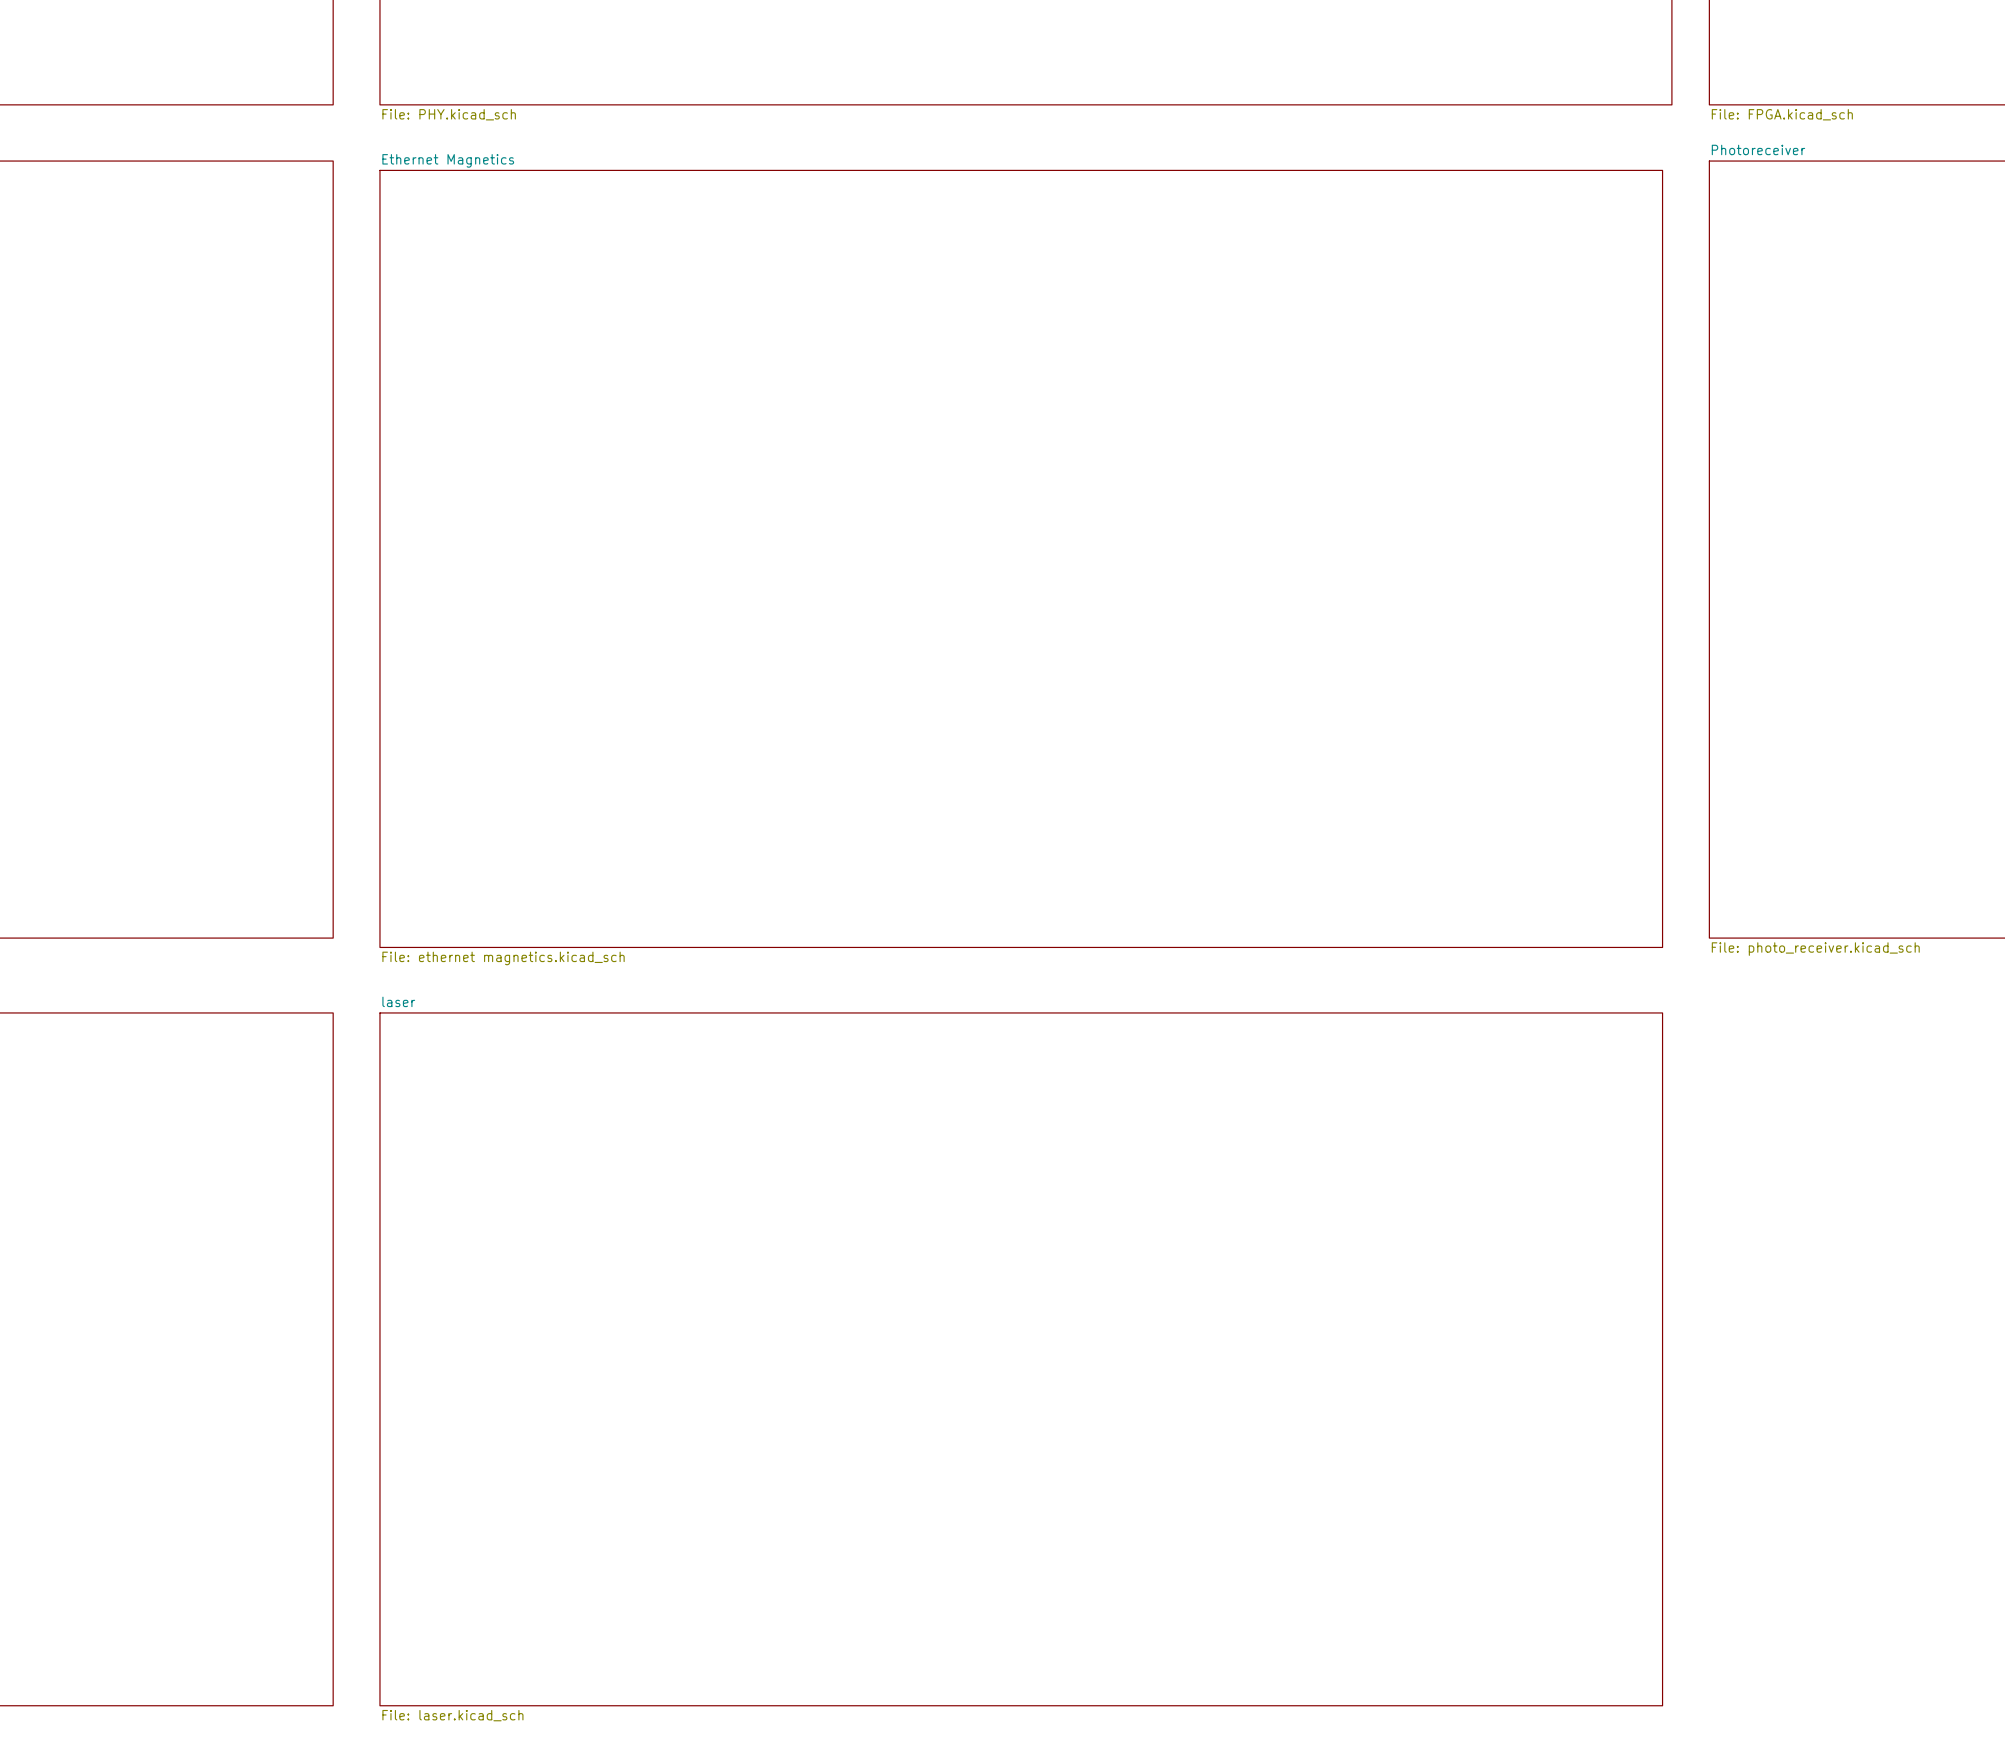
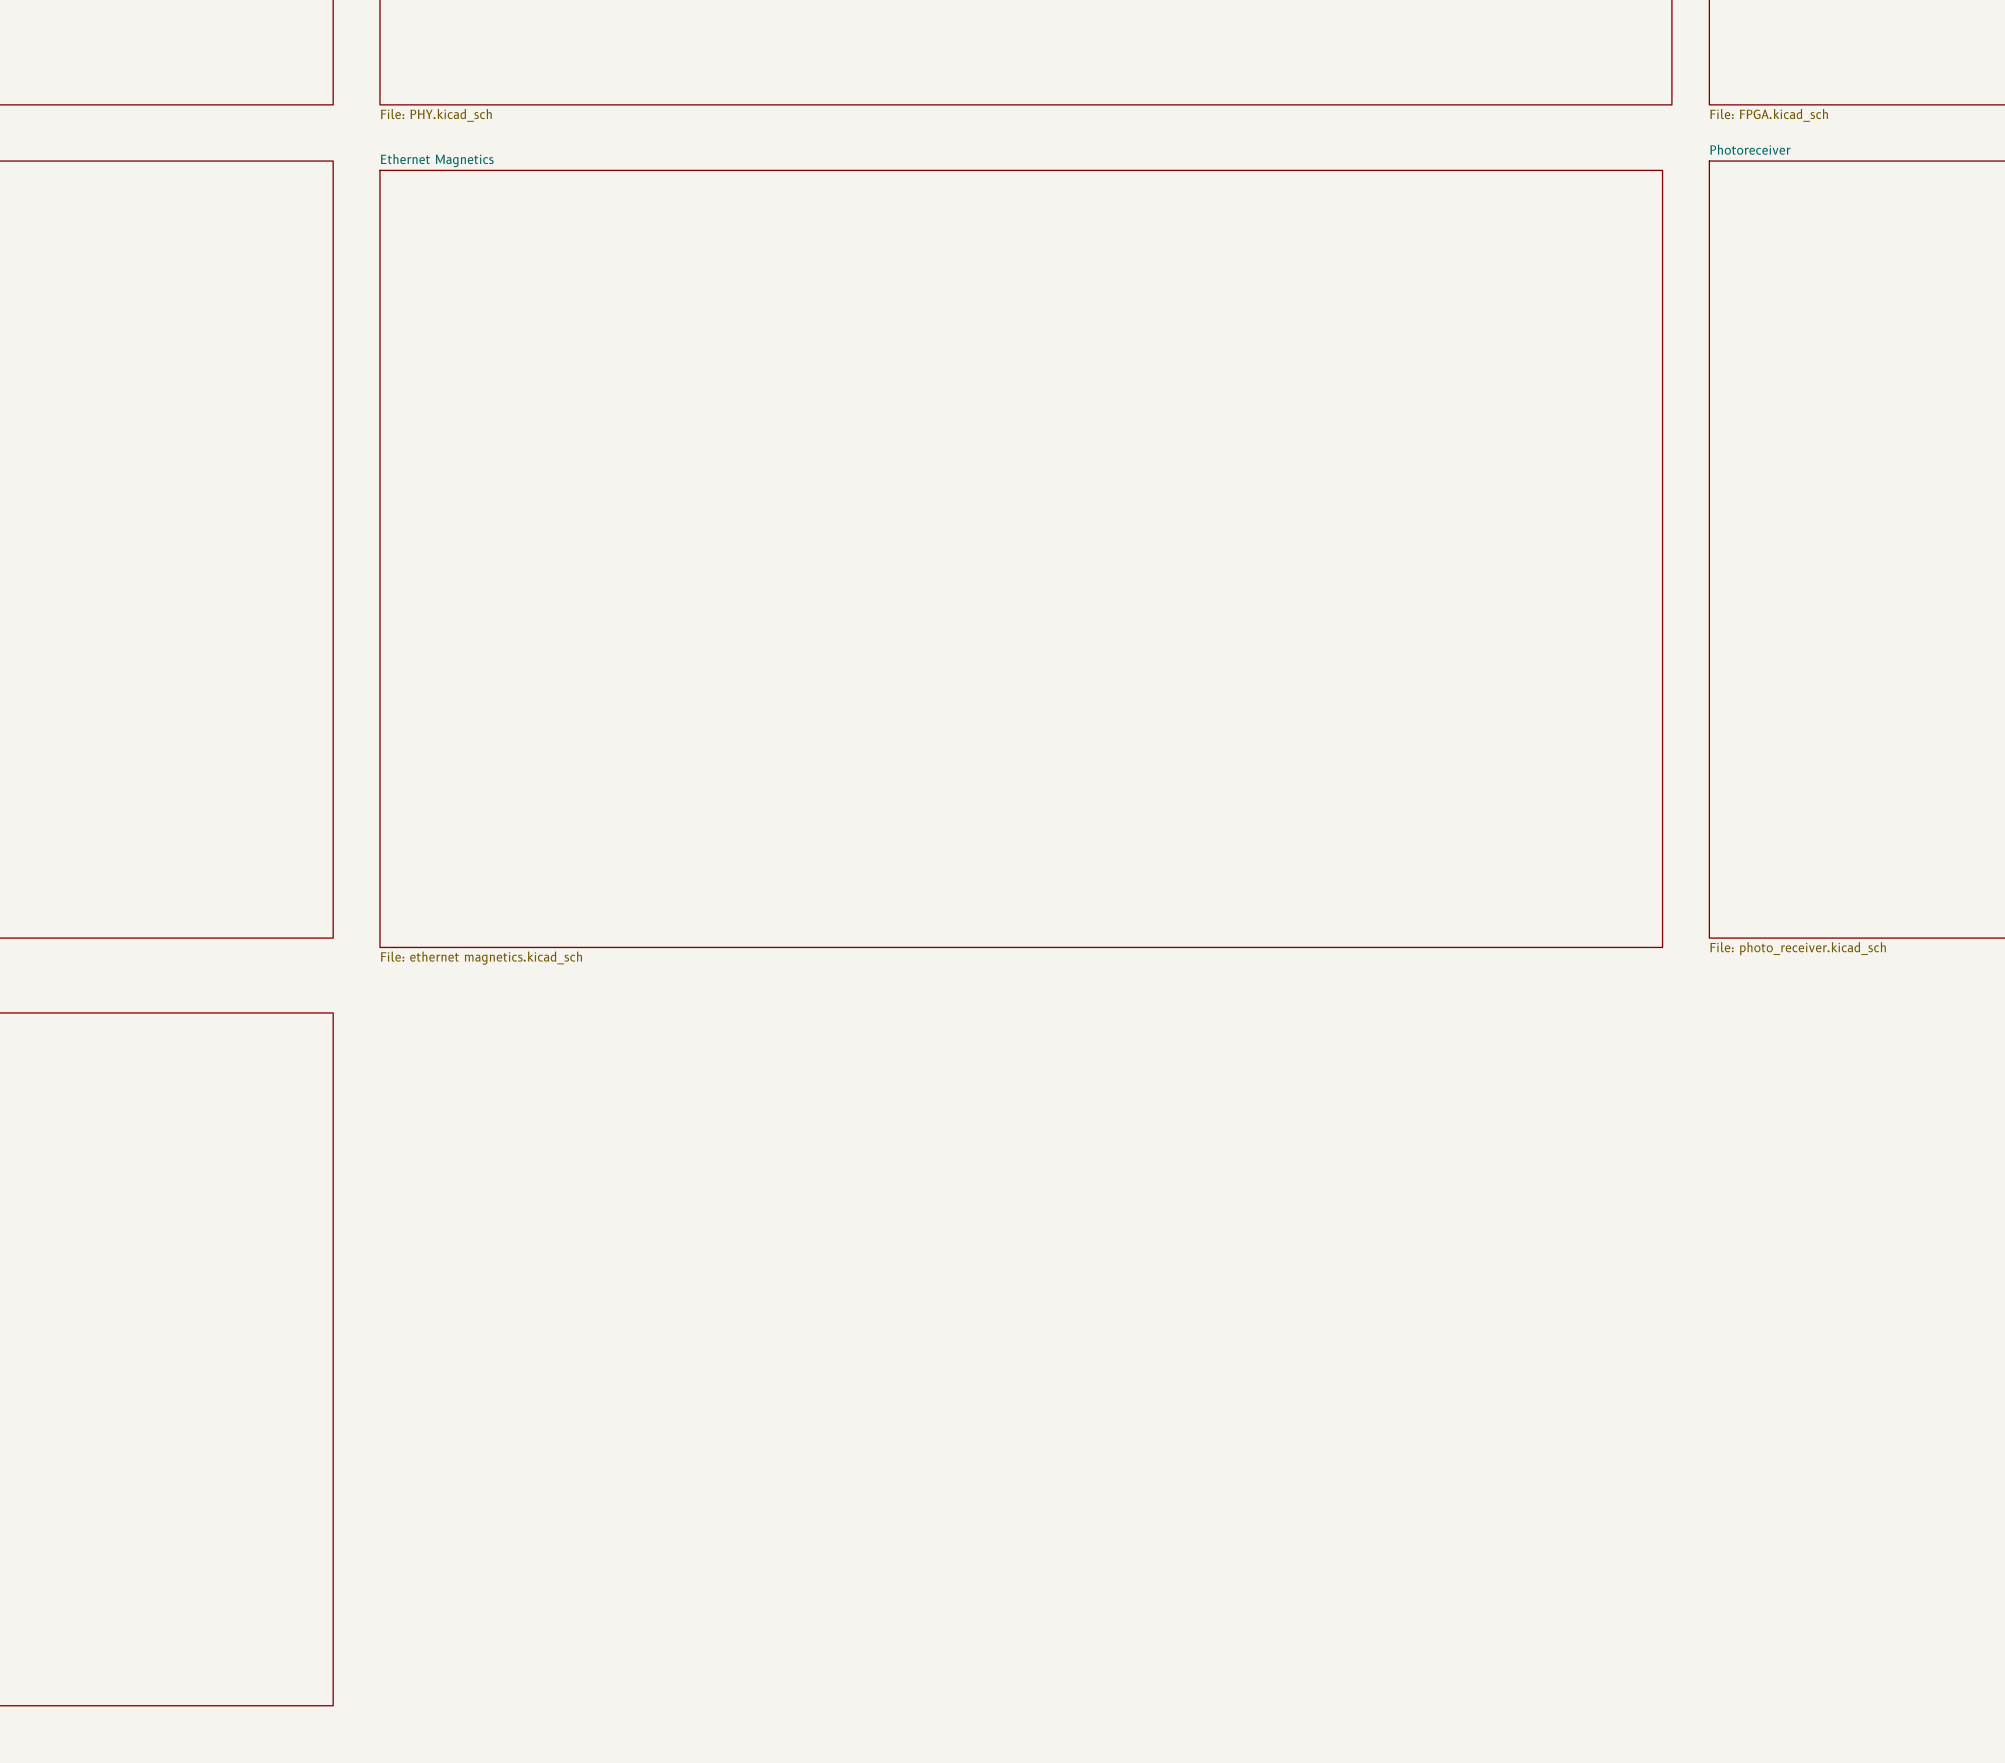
sheet laser: File: laser.kicad_sch (1021, 1359) -> none

